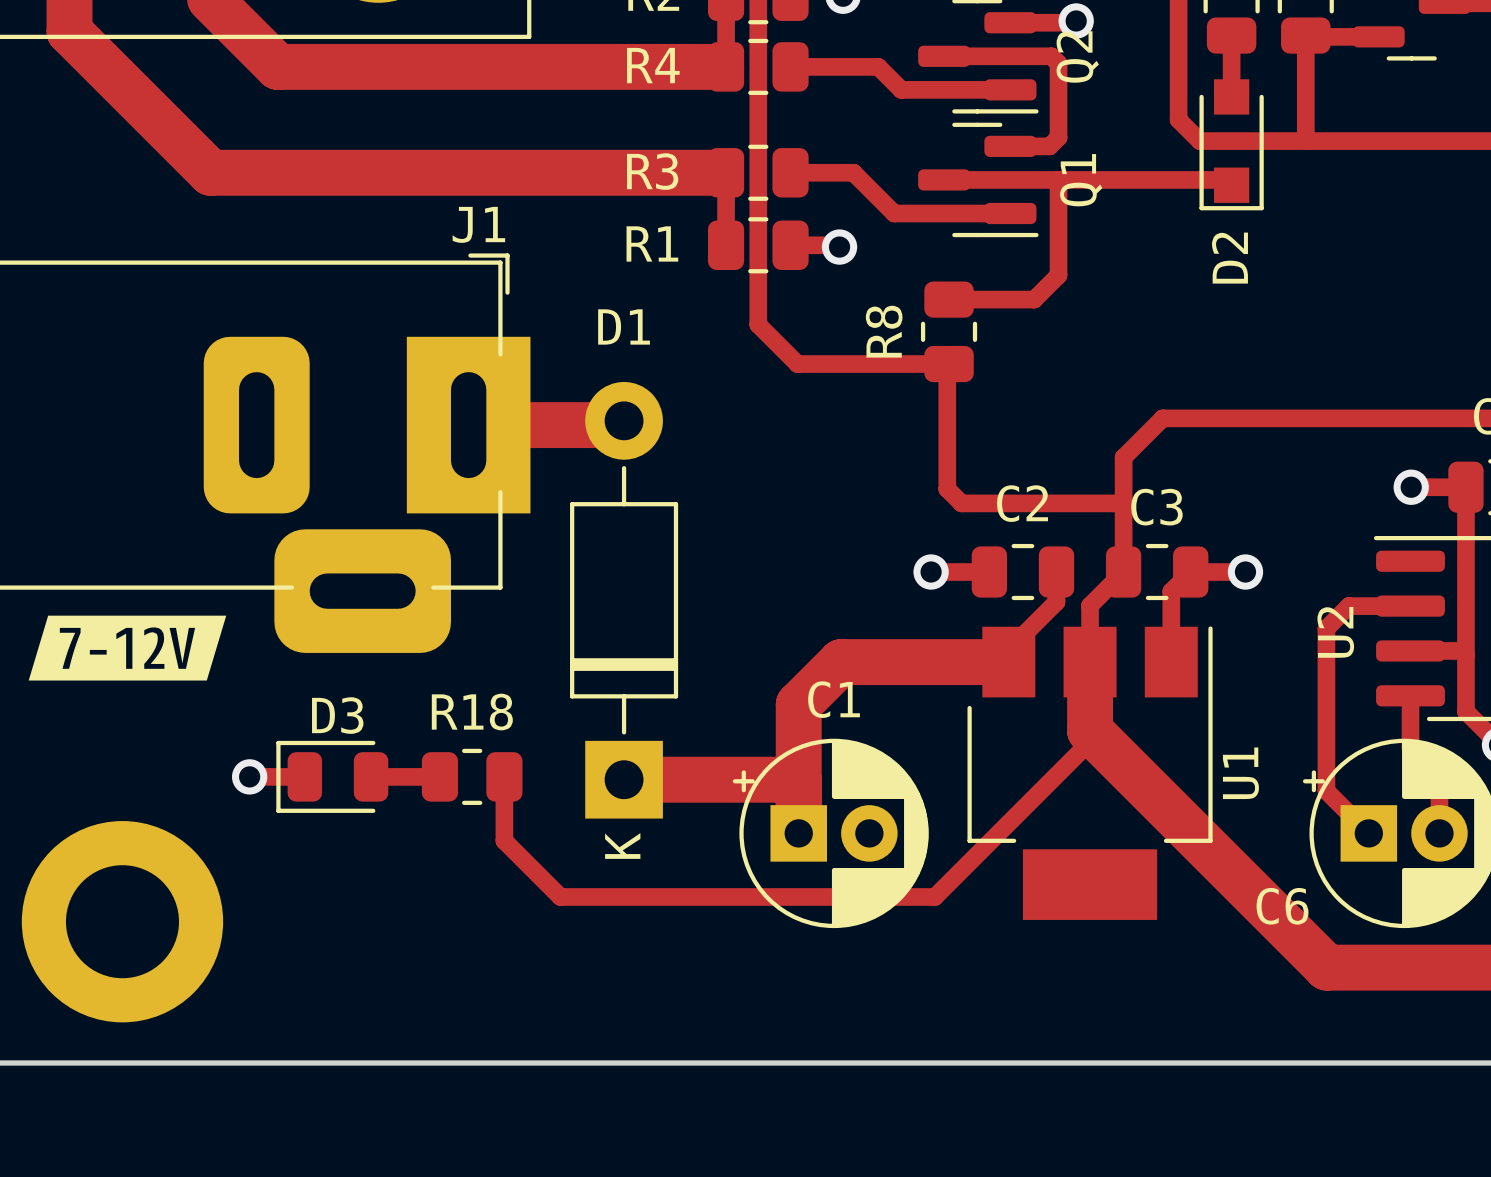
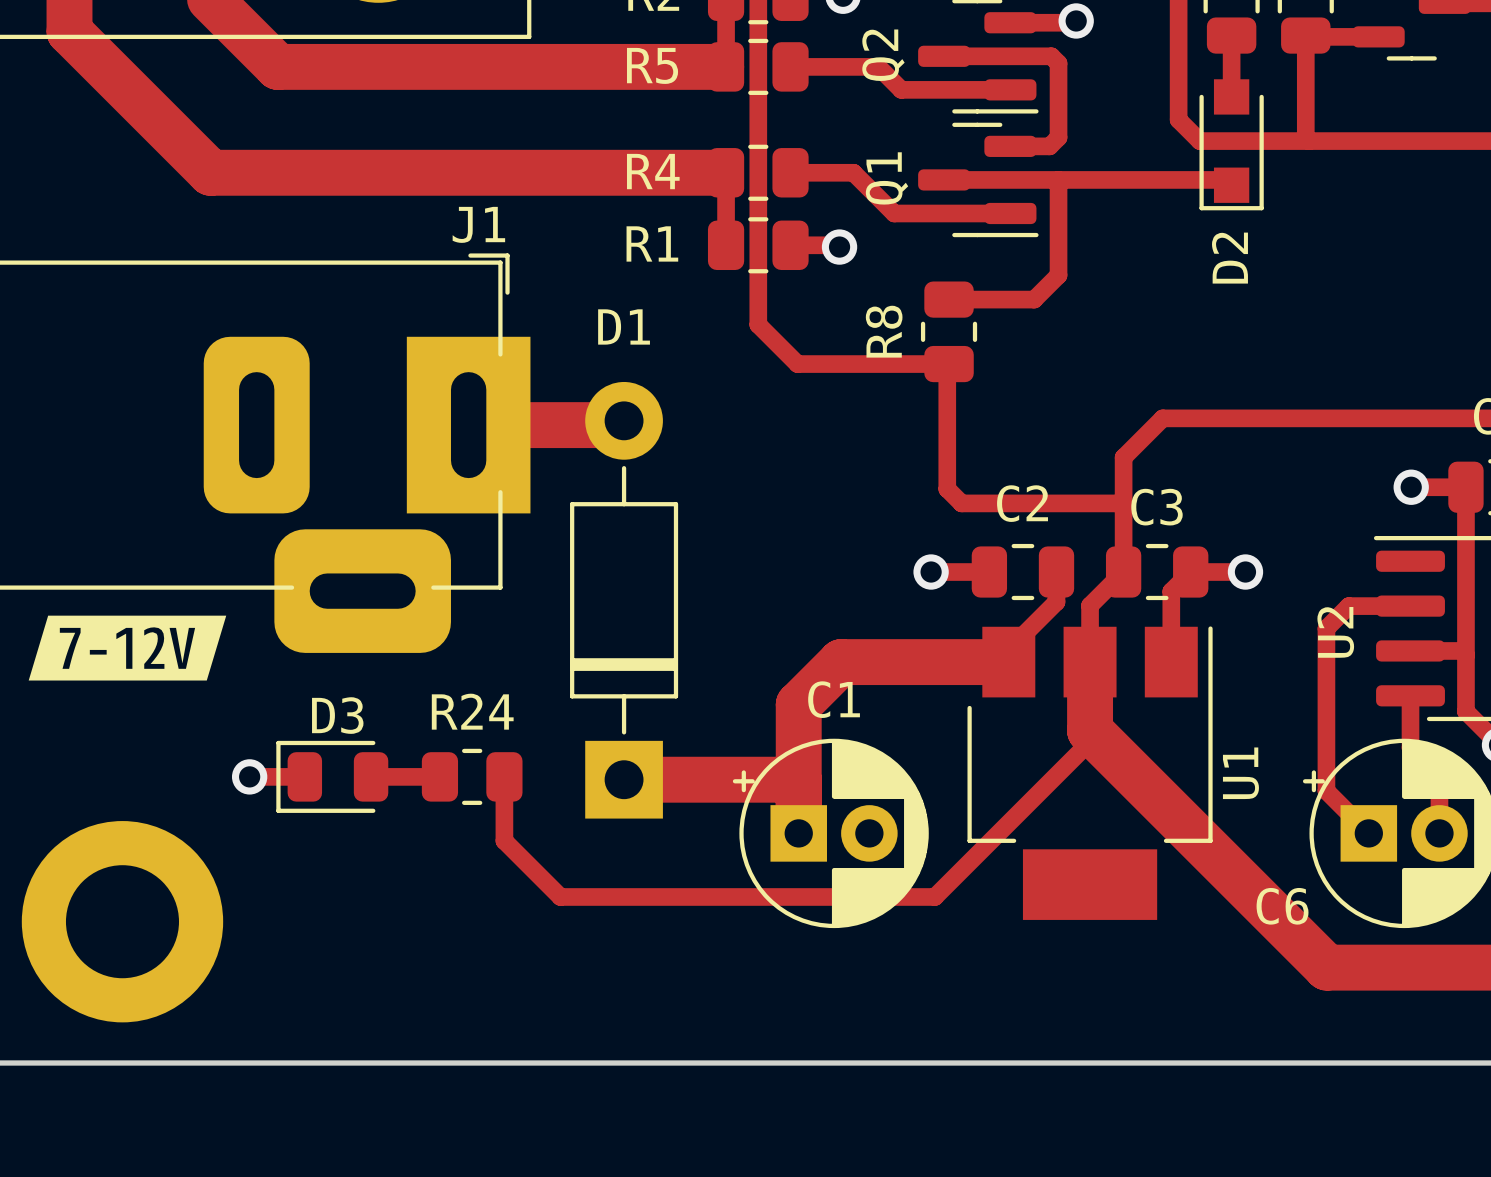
Q2 name position: Q2 (1077, 56) -> Q2 (883, 55)
R4 name: R4 (653, 65) -> R5 (652, 65)
R3 name: R3 (652, 171) -> R4 (653, 171)
Q1 name position: Q1 (1081, 180) -> Q1 (887, 178)
R18 name: R18 (472, 712) -> R24 (472, 711)
D1 text: K (622, 846) -> none

